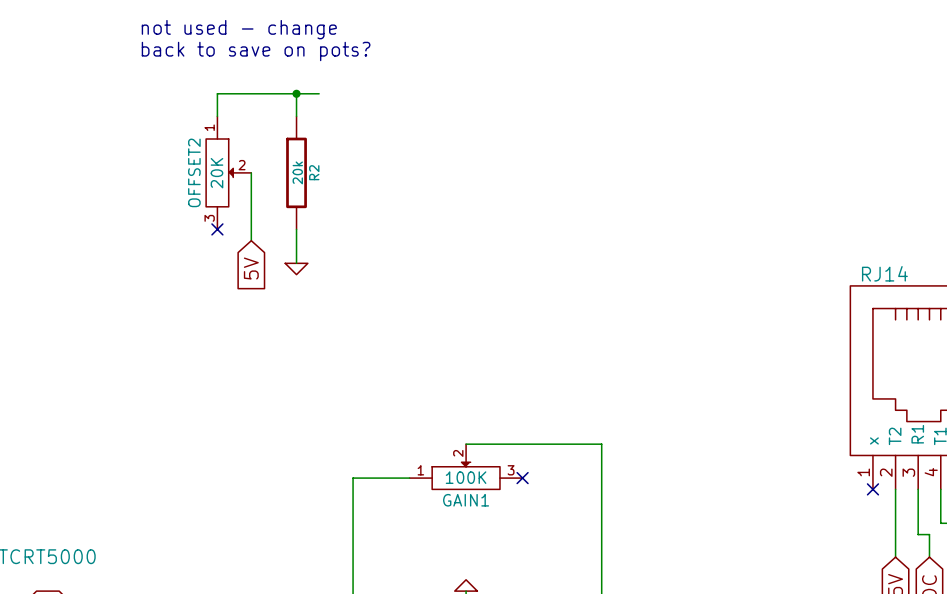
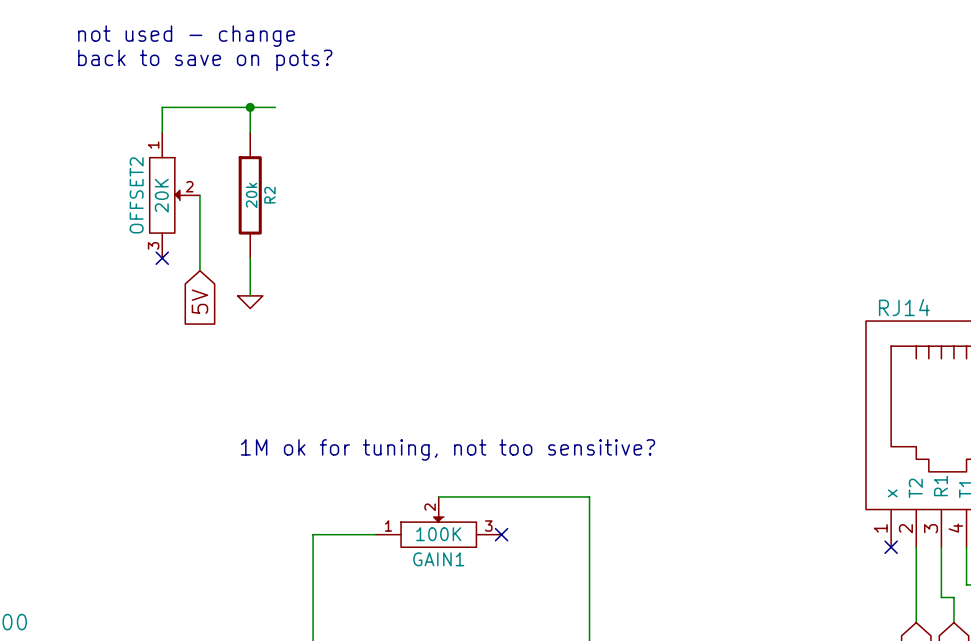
text: none -> 1M ok for tuning, not too sensitive? (447, 449)

